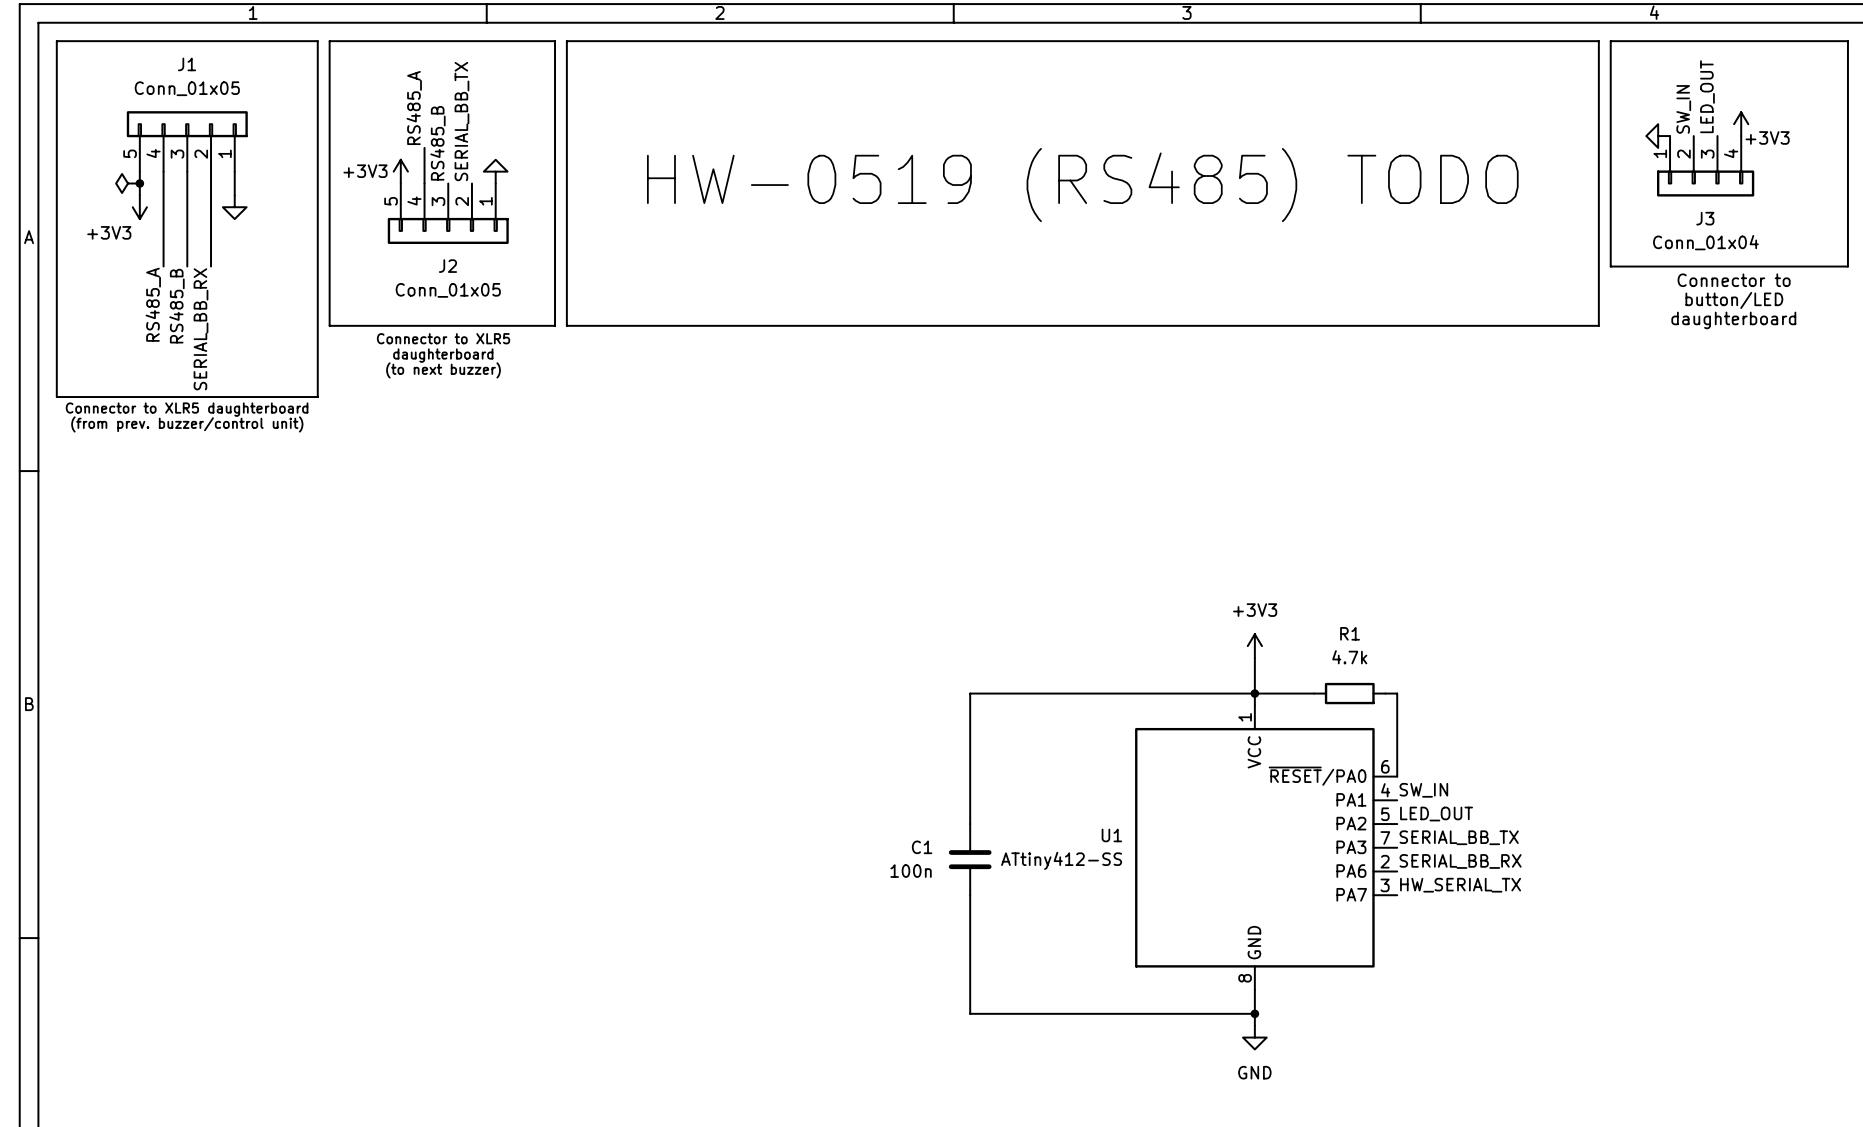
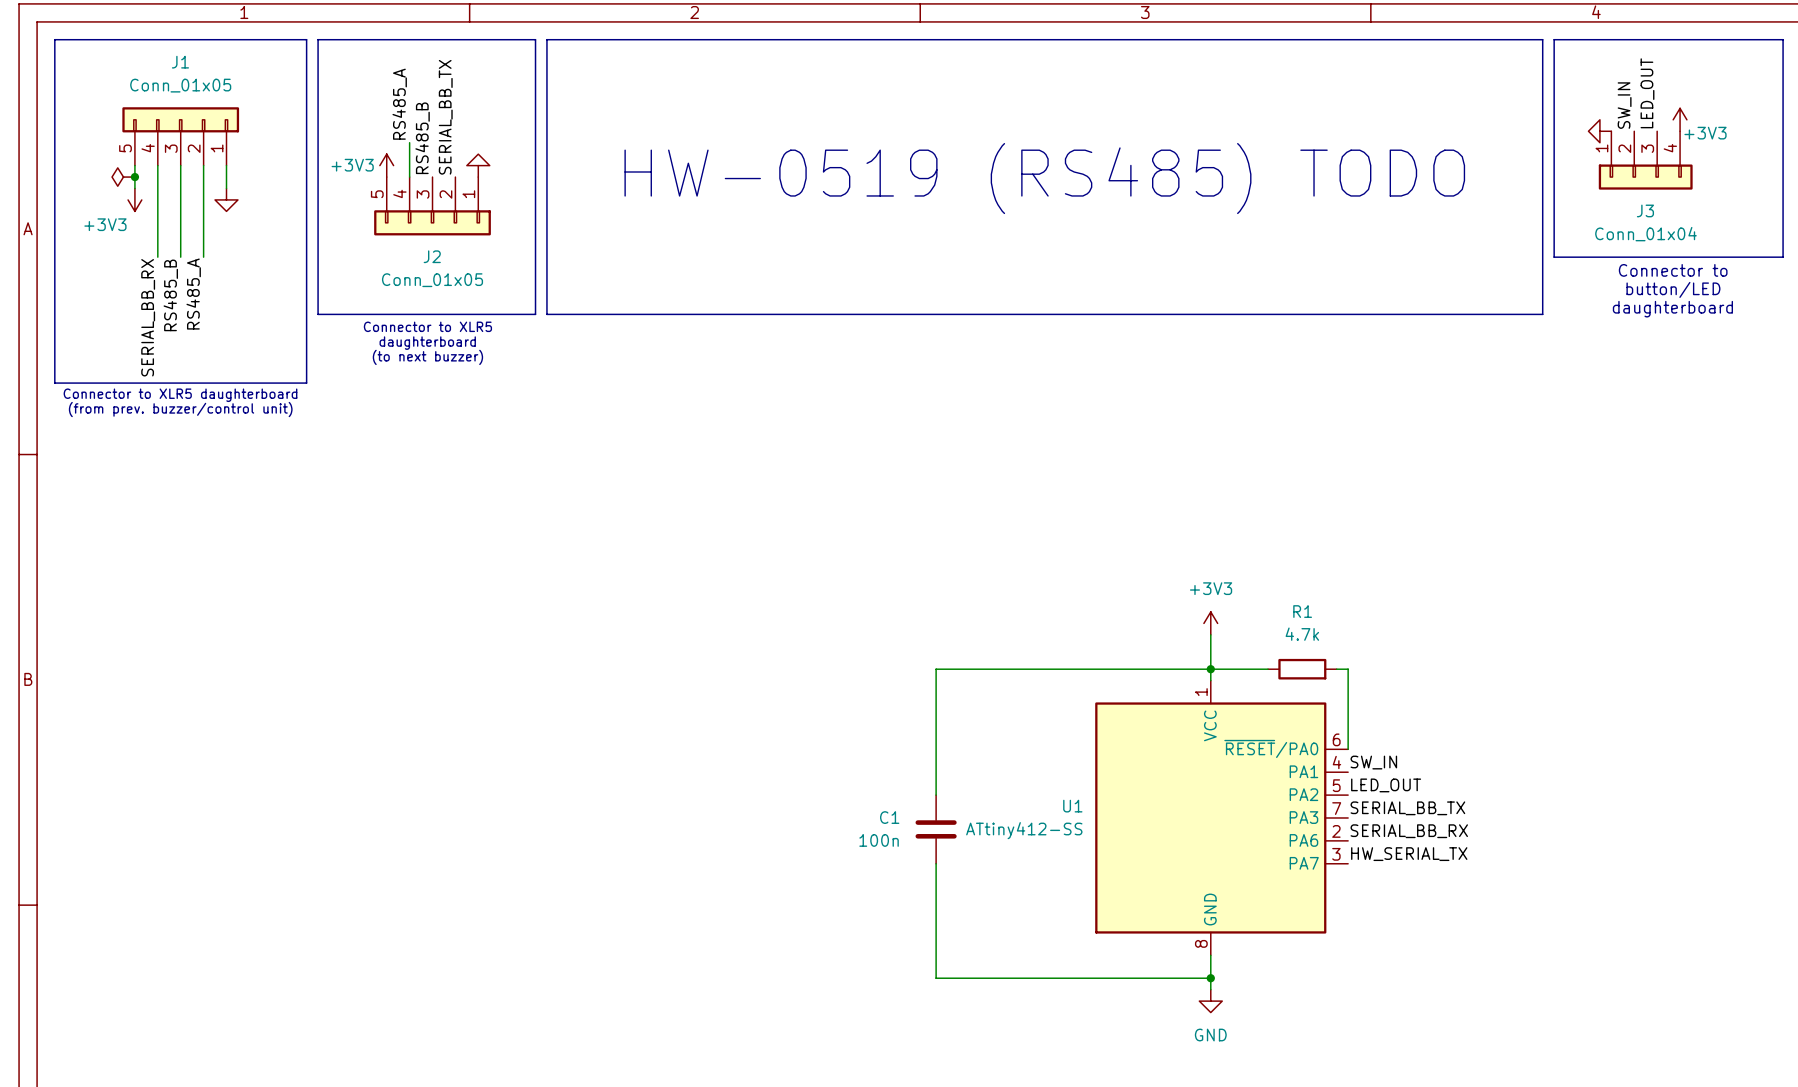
label: RS485_A (153, 304) -> SERIAL_BB_RX (148, 317)
label: SERIAL_BB_RX (201, 329) -> RS485_A (193, 294)

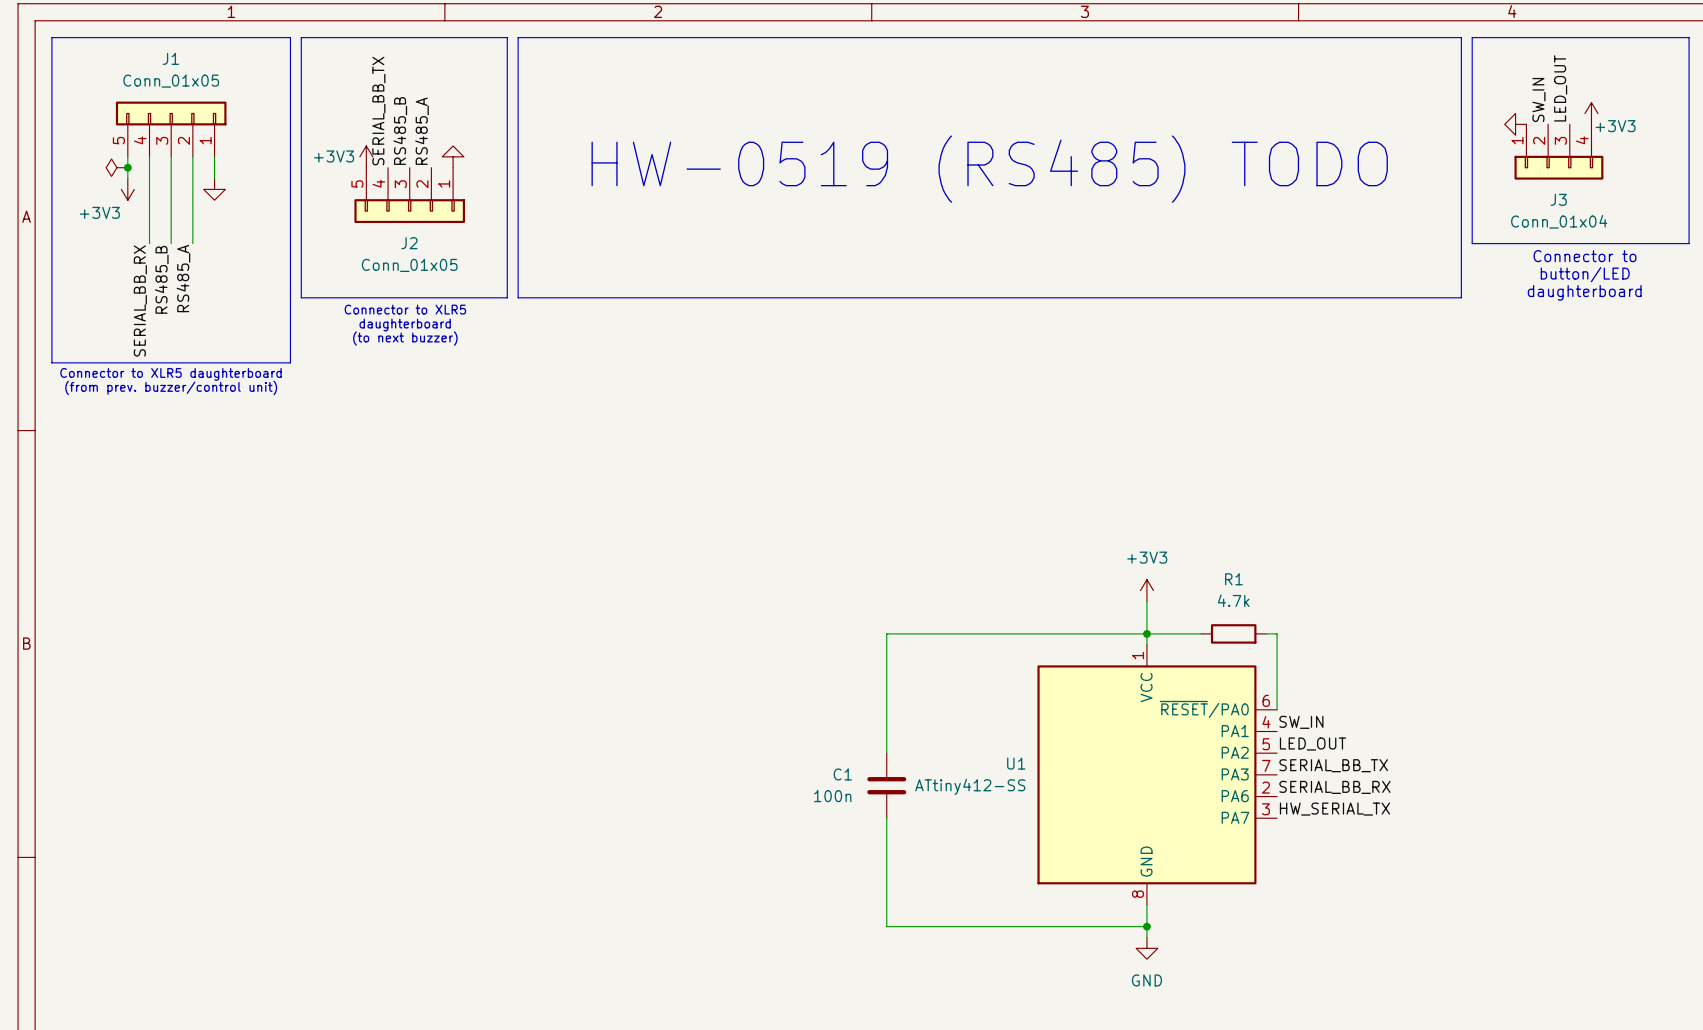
label: RS485_A (399, 104) -> none
label: none -> SERIAL_BB_TX (378, 111)
label: SERIAL_BB_TX (445, 117) -> RS485_A (421, 131)
wire: (409, 142) (409, 177) -> none

